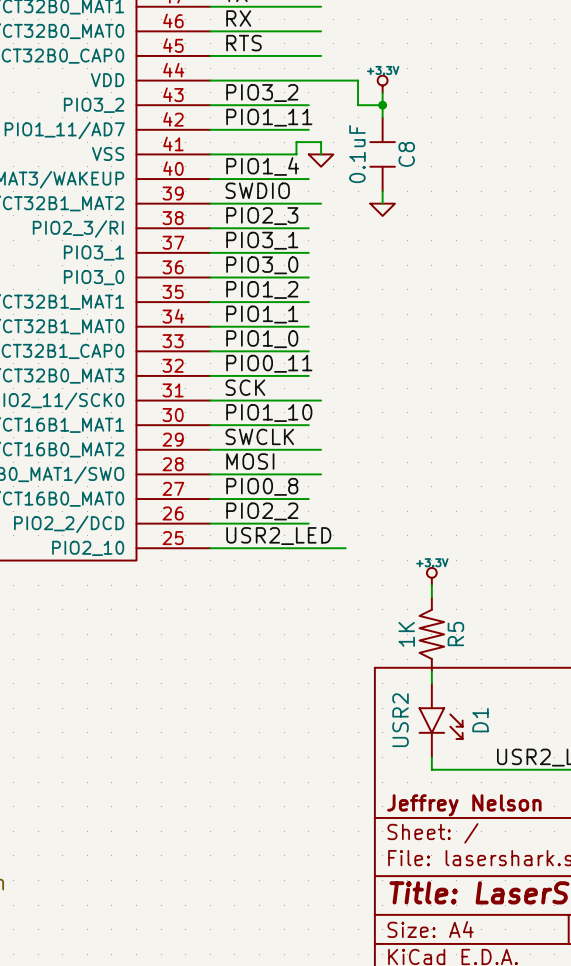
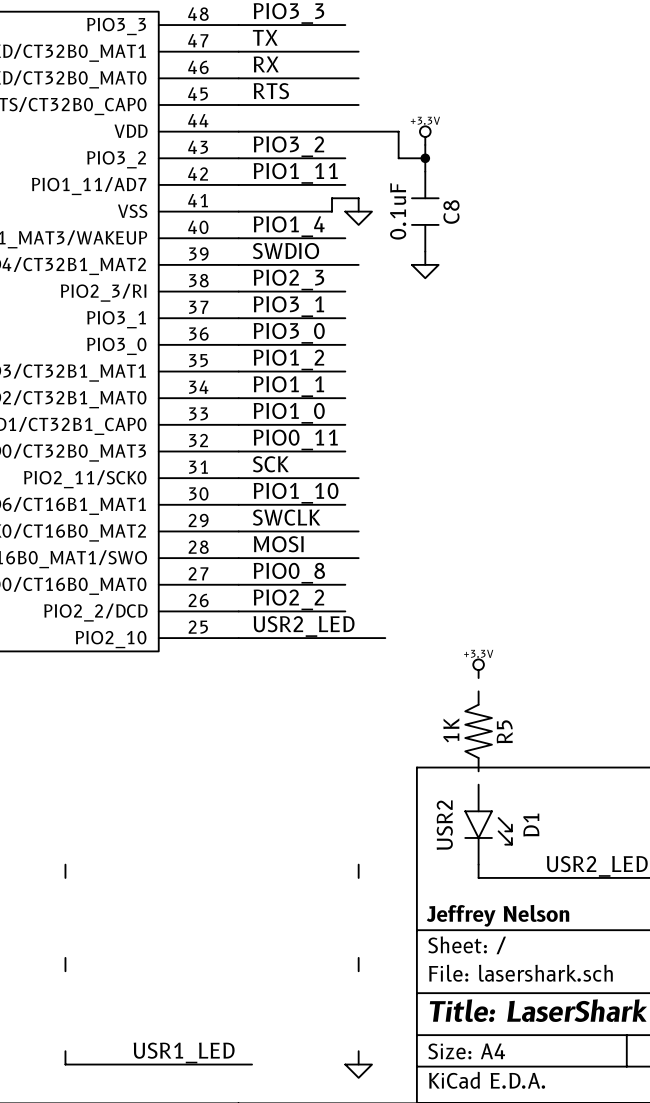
wire: (431, 585) (431, 597) -> (358, 864) (358, 877)
wire: (431, 671) (431, 683) -> (358, 957) (358, 971)
wire: none -> (65, 864) (65, 877)
wire: none -> (65, 957) (65, 971)
wire: none -> (65, 1051) (65, 1064) (252, 1064)
label: none -> USR1_LED (184, 1052)
wire: none -> (358, 1051) (358, 1064)
power symbol: none -> (358, 1071)

